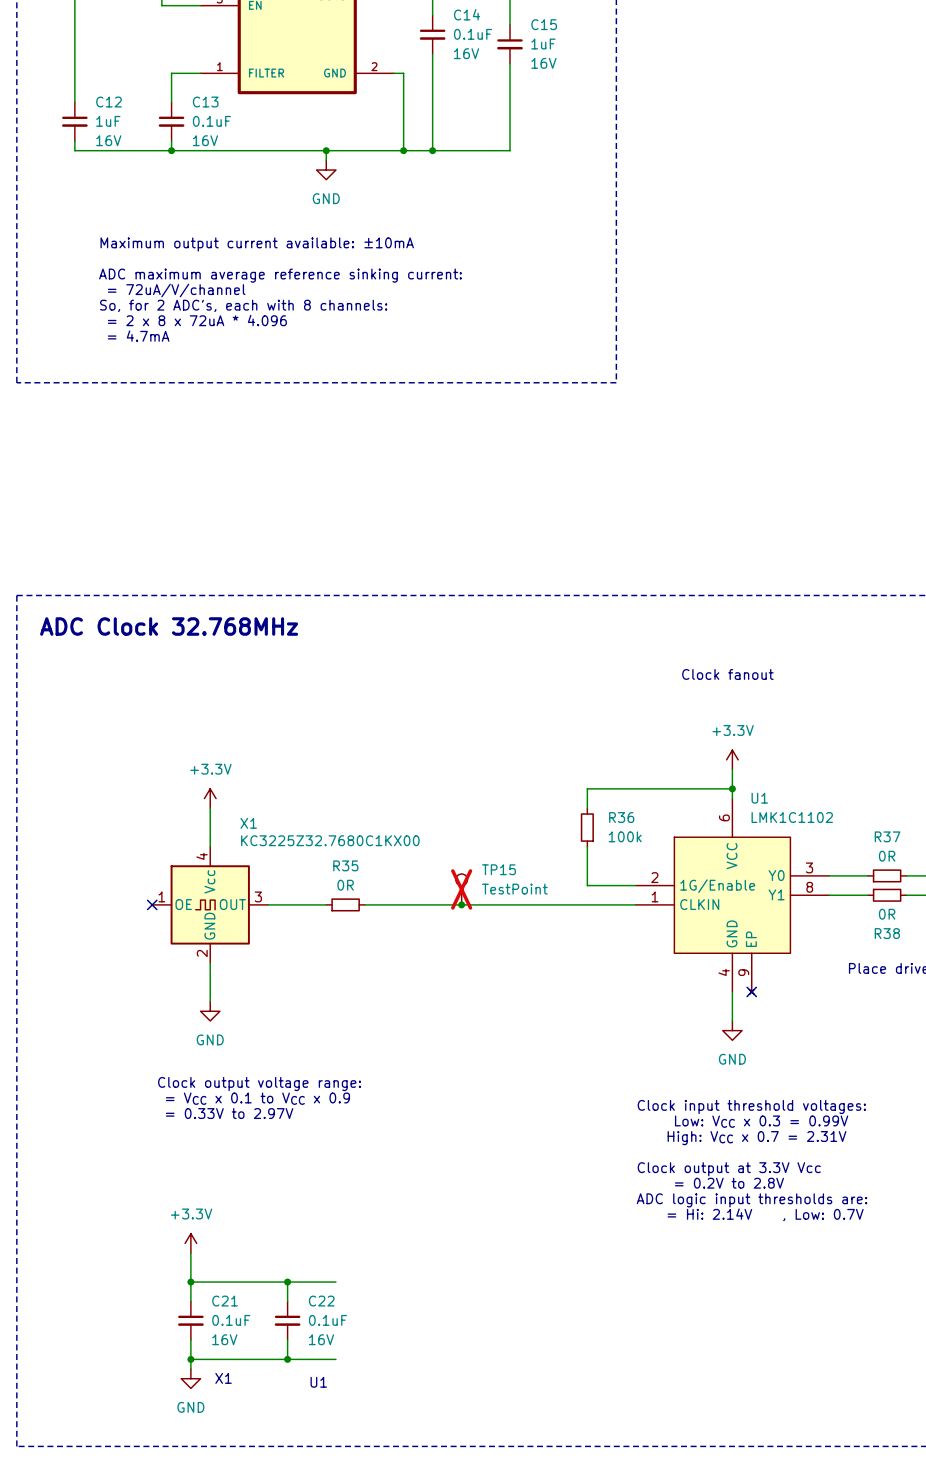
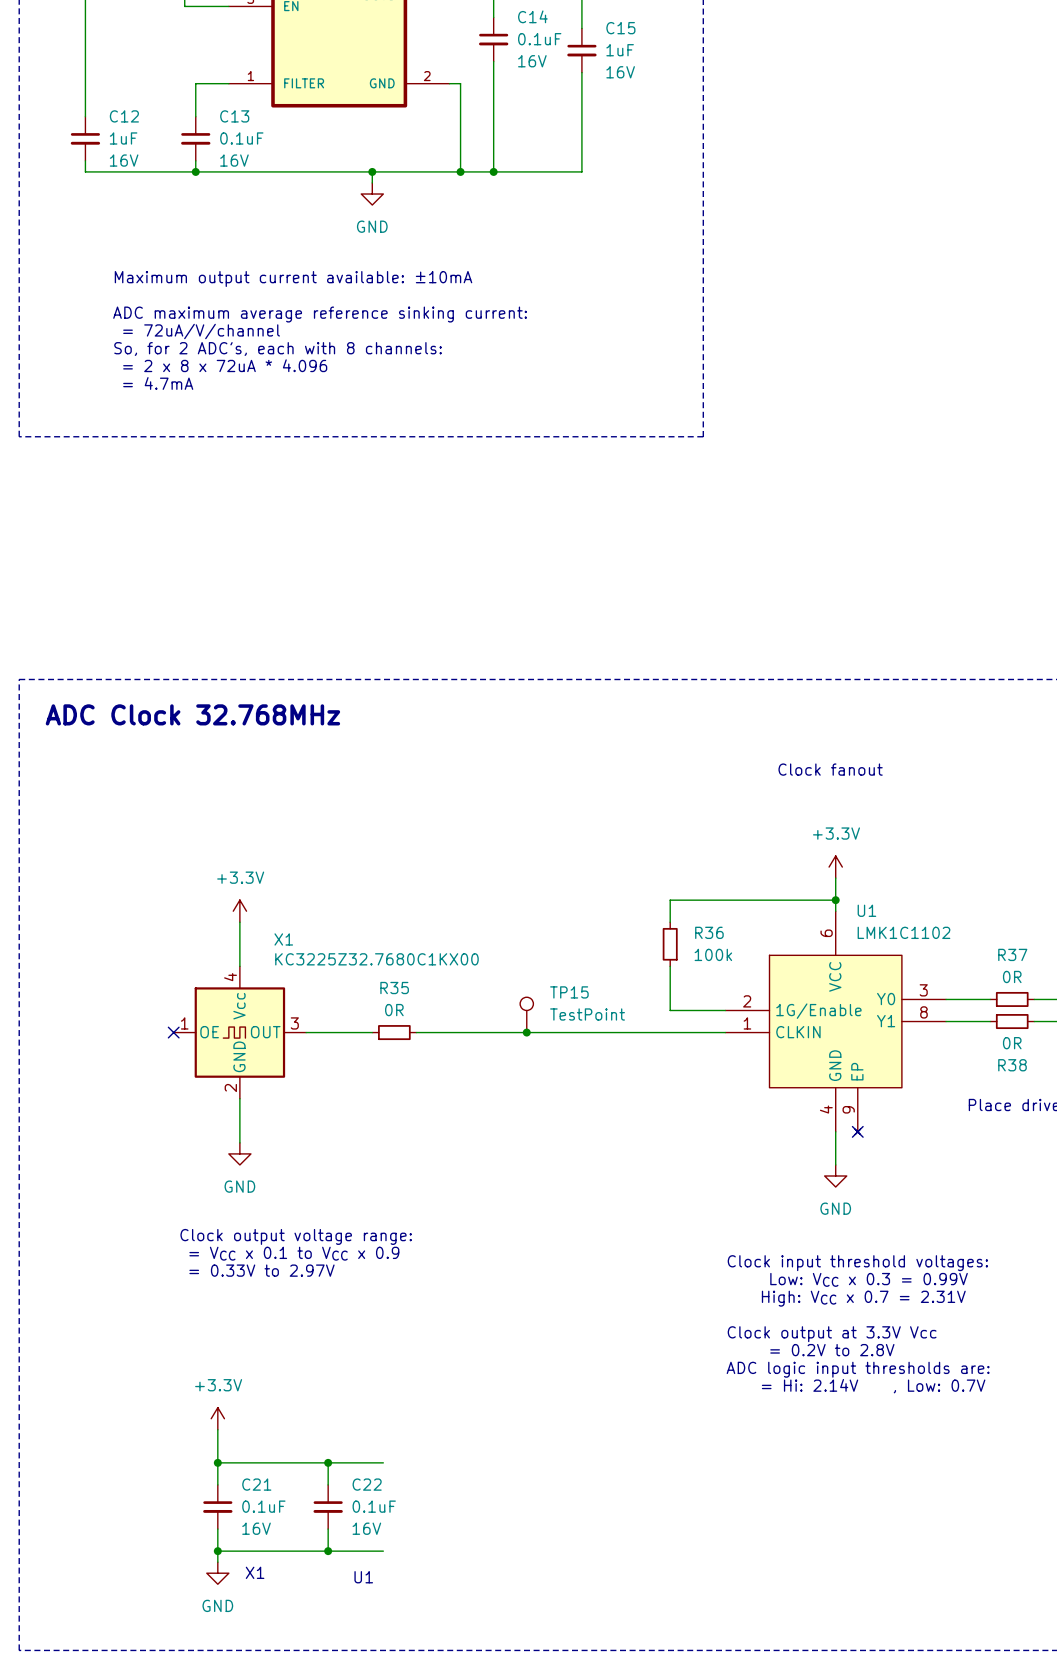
TP15 do-not-place cross: (461, 889) -> none

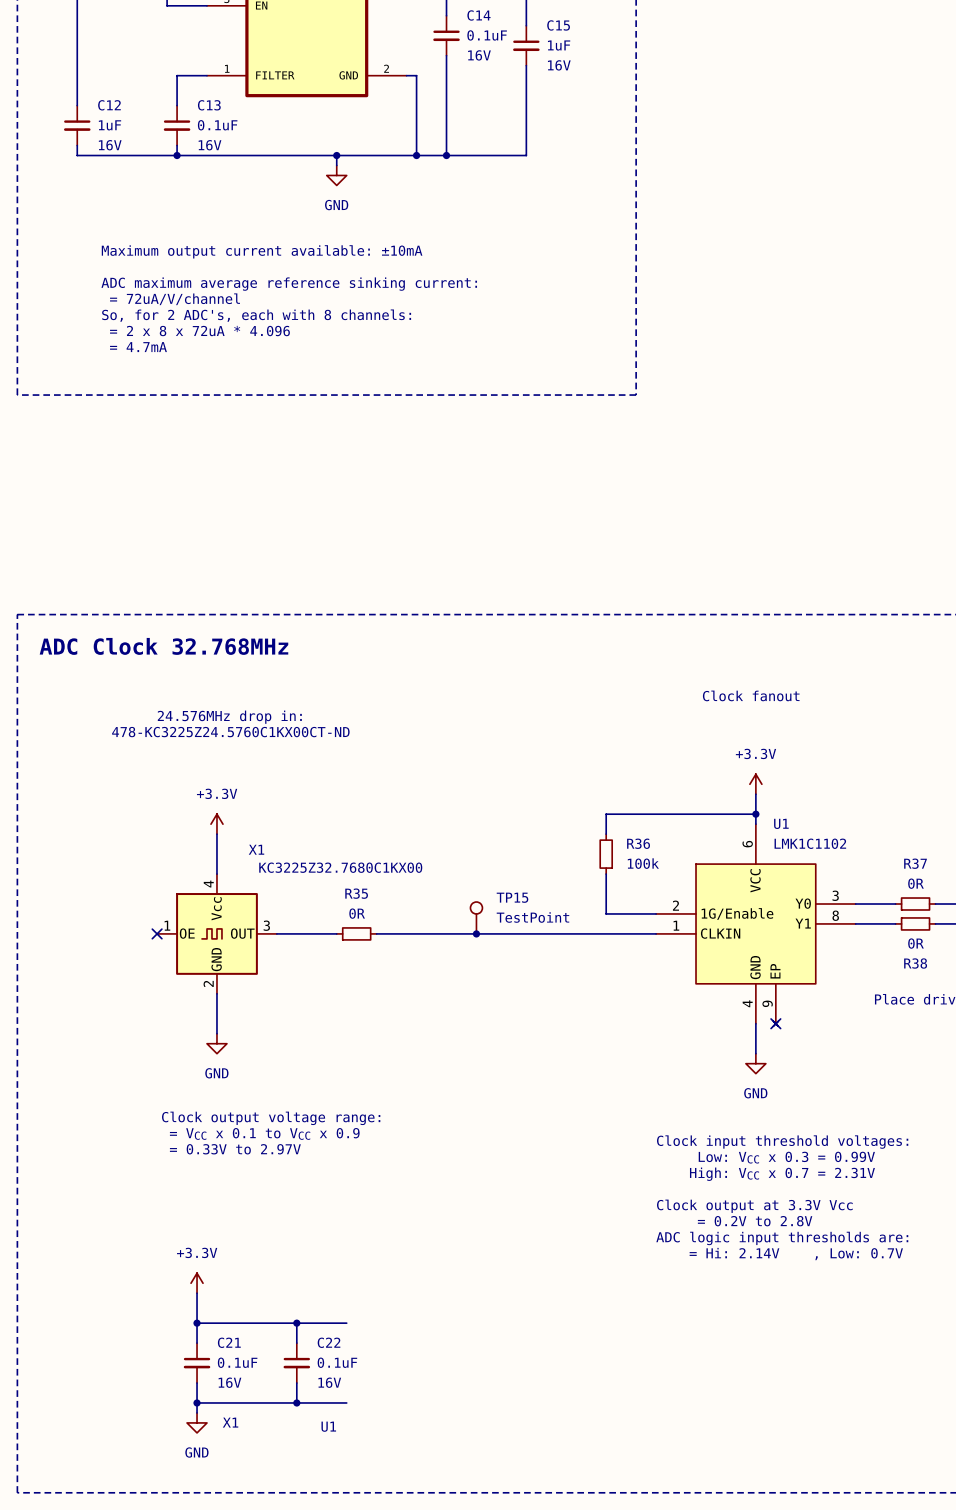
text: none -> 24.576MHz drop in: (229, 717)
text: none -> 478-KC3225Z24.5760C1KX00CT-ND (230, 732)

